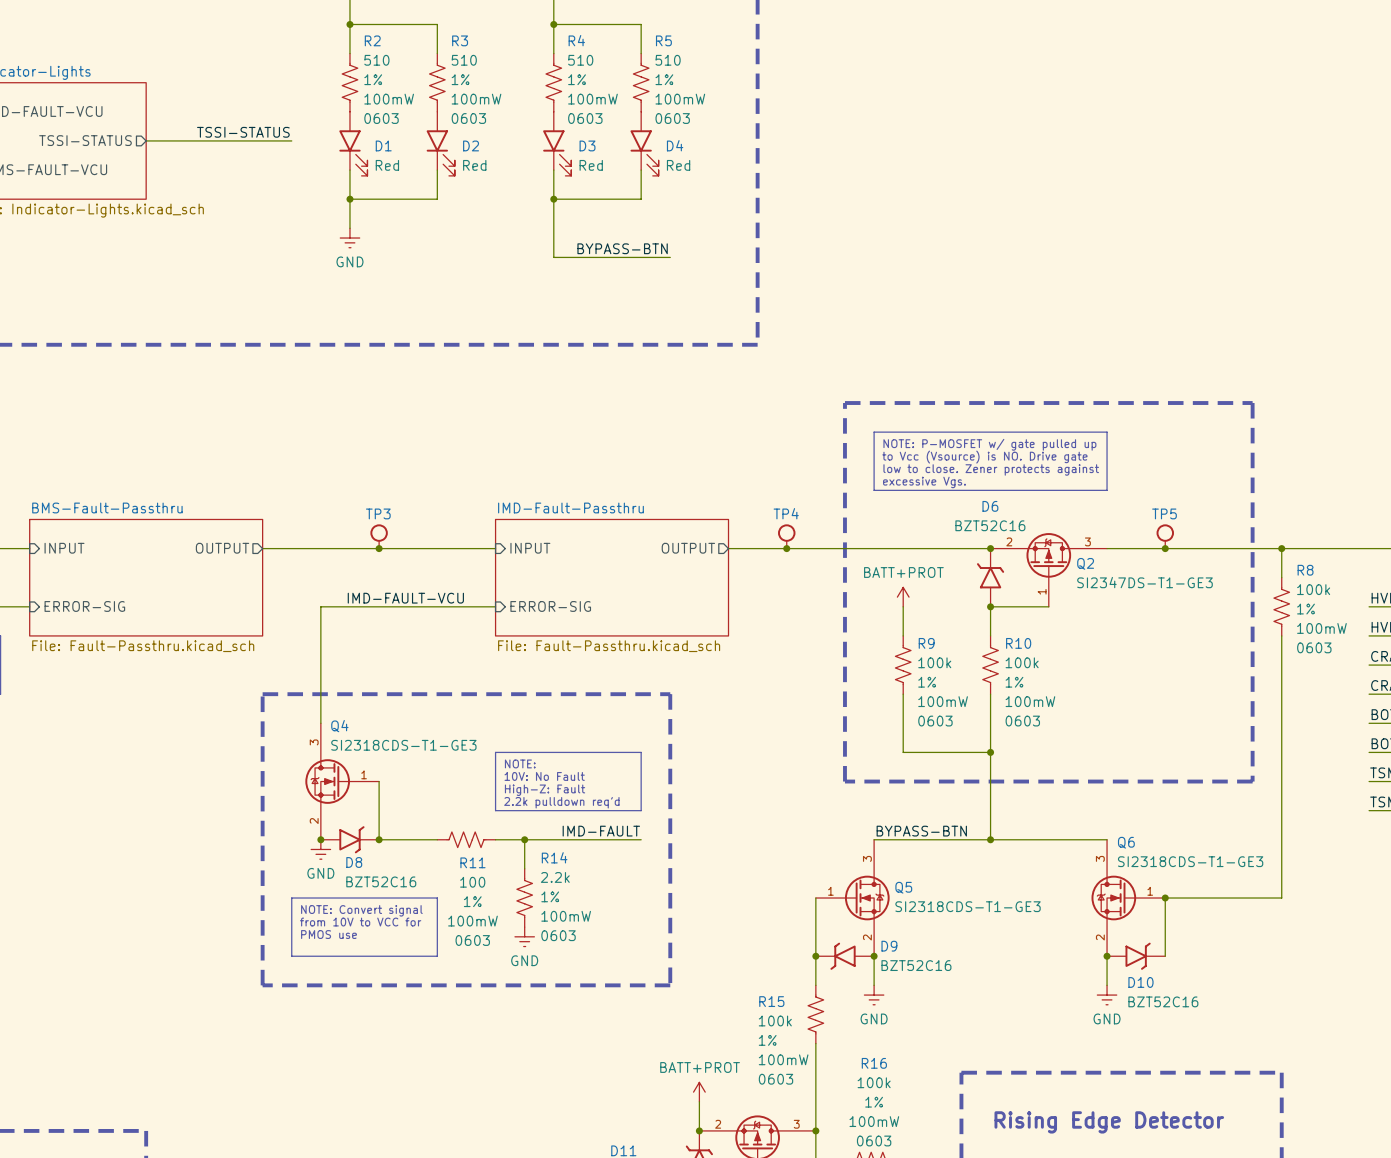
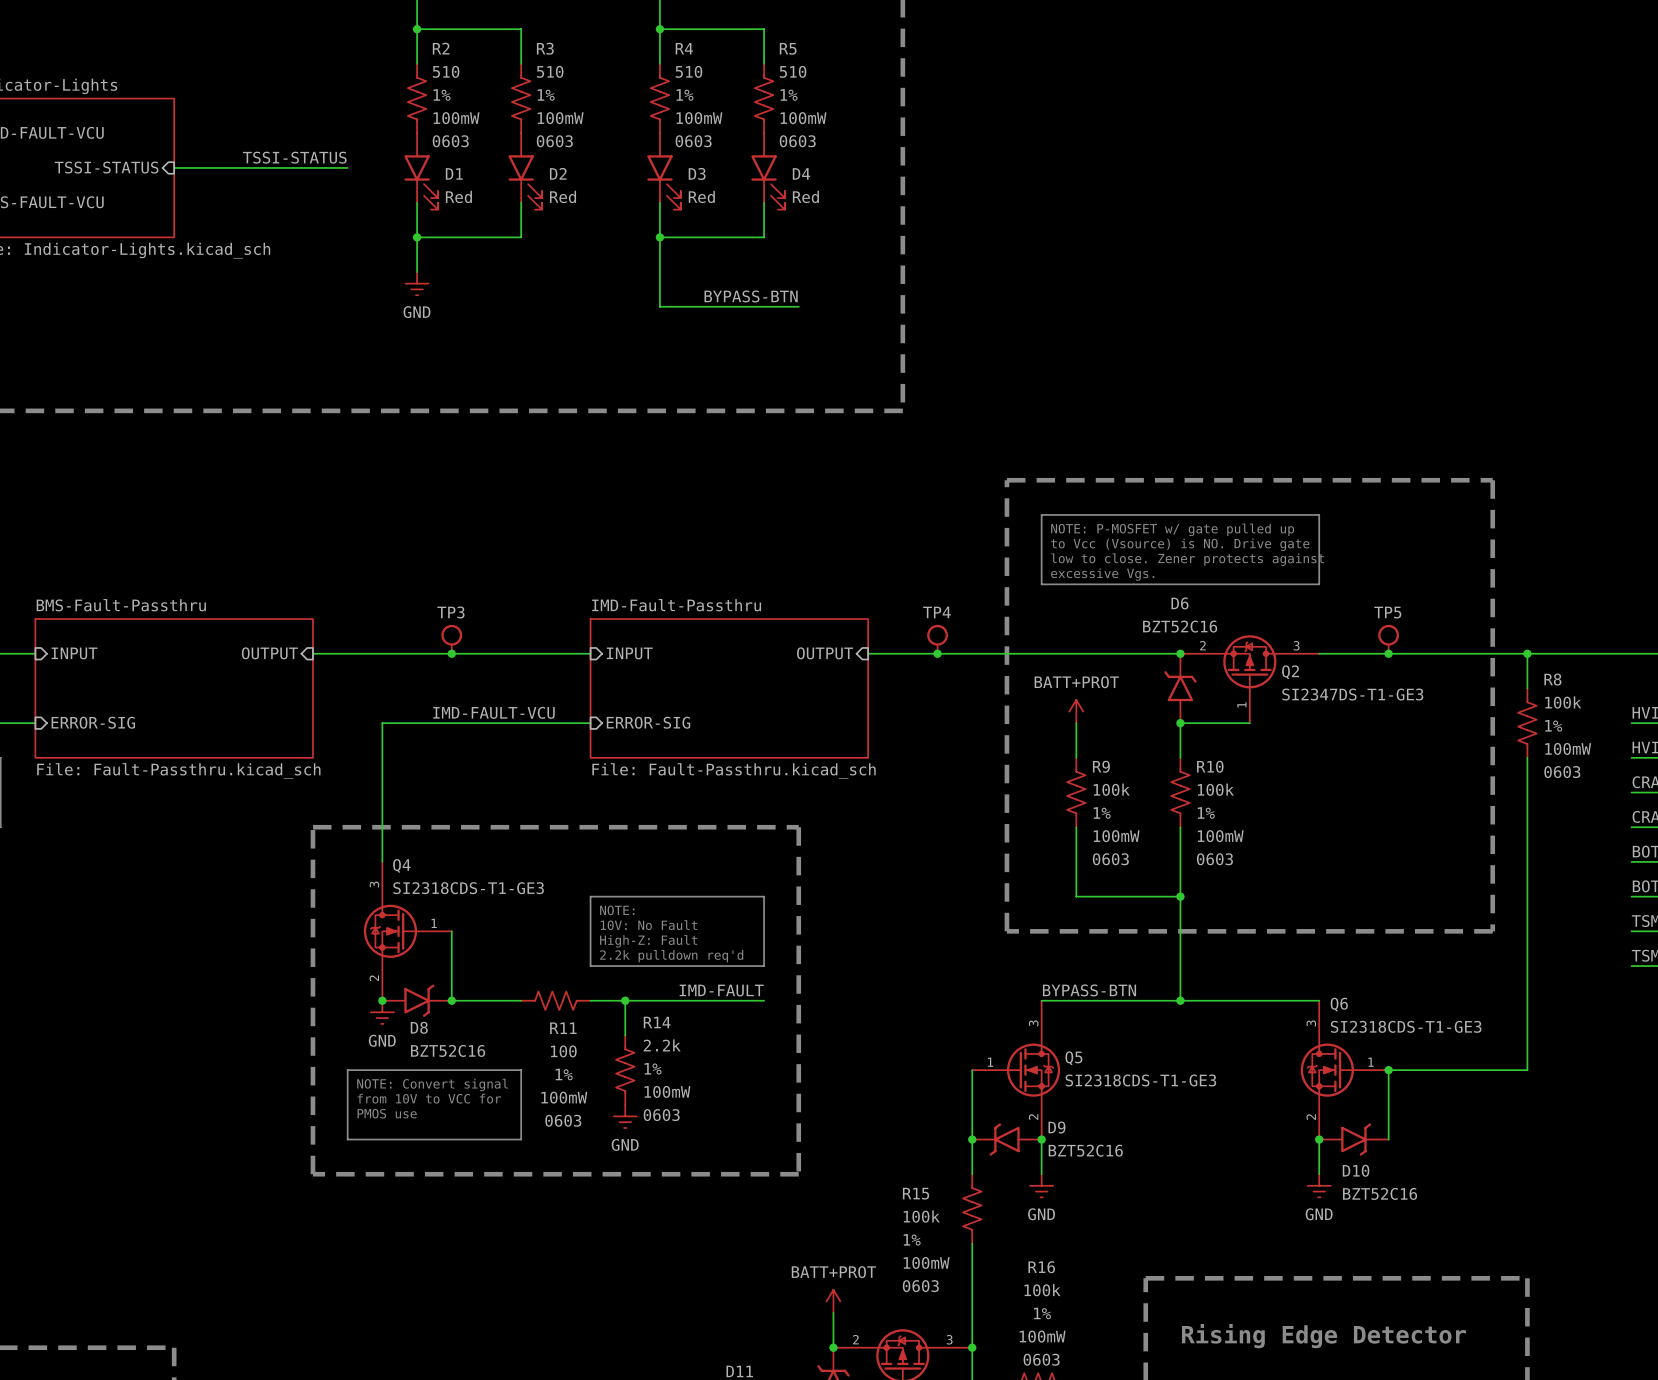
sheet pin shape: output (85, 140) -> input (106, 167)
sheet pin shape: output (222, 548) -> input (269, 653)
sheet pin shape: output (688, 548) -> input (825, 653)

